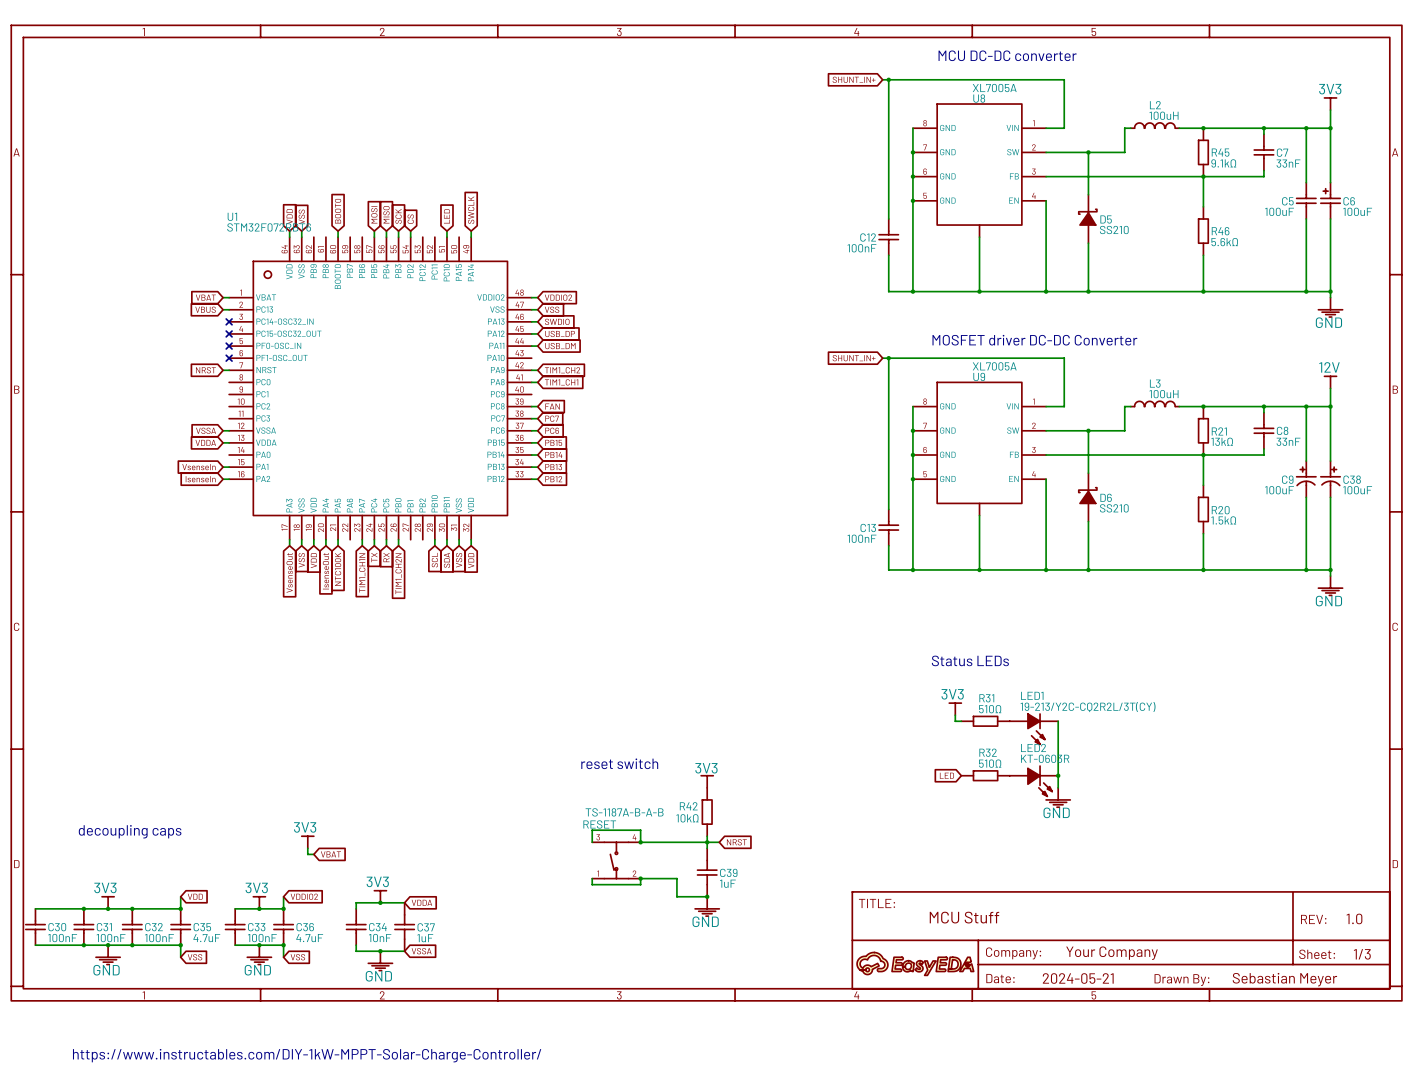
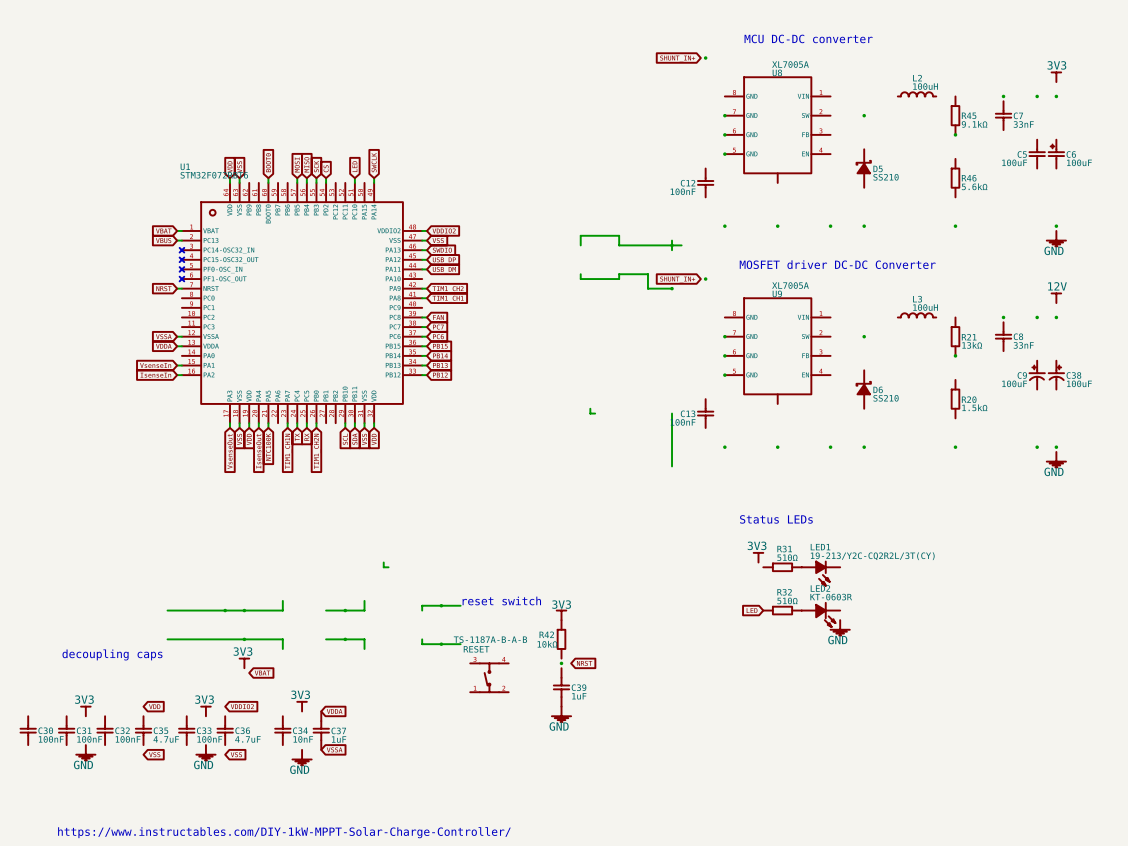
wire: (882, 79) (1064, 79) (1064, 128) (1046, 128) -> none
wire: (888, 79) (888, 218) -> none
wire: (1330, 110) (1330, 182) -> none
wire: (912, 128) (912, 291) -> none
wire: (1130, 128) (1124, 128) (1124, 152) (1046, 152) -> none
wire: (1179, 128) (1330, 128) -> none
junction: (1203, 128) -> none
wire: (1263, 128) (1263, 134) -> none
wire: (1306, 128) (1306, 182) -> none
wire: (1088, 152) (1088, 194) -> none
wire: (1263, 170) (1263, 176) (1046, 176) -> none
wire: (1203, 176) (1203, 206) -> none
wire: (1046, 200) (1046, 291) -> none
wire: (1306, 218) (1306, 291) -> none
wire: (1330, 218) (1330, 297) -> none
wire: (979, 237) (979, 291) -> none
wire: (1088, 243) (1088, 291) -> none
wire: (888, 255) (888, 291) (1330, 291) -> none
wire: (1203, 255) (1203, 291) -> none
junction: (1306, 291) -> none
wire: none -> (672, 240) (672, 250)
wire: none -> (580, 245) (580, 235) (619, 235) (619, 245) (681, 245)
wire: none -> (580, 274) (580, 279) (619, 279) (619, 274) (647, 274) (647, 288) (672, 288)
wire: (882, 358) (1064, 358) (1064, 406) (1046, 406) -> none
wire: (888, 358) (888, 509) -> none
junction: none -> (672, 288)
wire: (1330, 388) (1330, 461) -> none
wire: (912, 406) (912, 569) -> none
wire: (1130, 406) (1124, 406) (1124, 430) (1046, 430) -> none
wire: (1179, 406) (1330, 406) -> none
junction: (1203, 406) -> none
wire: (1263, 406) (1263, 412) -> none
wire: (1306, 406) (1306, 461) -> none
wire: (1088, 430) (1088, 473) -> none
wire: (1263, 448) (1263, 455) (1046, 455) -> none
wire: (1203, 455) (1203, 485) -> none
wire: (1046, 479) (1046, 569) -> none
wire: (1306, 497) (1306, 569) -> none
wire: (1330, 497) (1330, 576) -> none
part: (706, 513) -> none
wire: (979, 515) (979, 569) -> none
wire: none -> (590, 408) (590, 413) (595, 413)
wire: (1088, 521) (1088, 569) -> none
wire: none -> (672, 413) (672, 466)
wire: (1203, 533) (1203, 569) -> none
wire: (888, 545) (888, 569) (1330, 569) -> none
wire: none -> (383, 562) (383, 567) (388, 567)
wire: (955, 715) (955, 721) (961, 721) -> none
wire: (1058, 721) (1058, 787) -> none
wire: none -> (282, 600) (282, 610) (167, 610)
wire: none -> (364, 600) (364, 610) (326, 610)
junction: none -> (441, 605)
wire: none -> (460, 605) (422, 605) (422, 610)
junction: none -> (225, 610)
junction: none -> (244, 610)
junction: none -> (345, 610)
junction: (1058, 775) -> none
wire: none -> (167, 639) (282, 639) (282, 648)
junction: none -> (244, 639)
wire: none -> (326, 639) (364, 639) (364, 648)
junction: none -> (345, 639)
wire: none -> (422, 639) (422, 644) (460, 644)
junction: none -> (441, 644)
wire: (707, 836) (707, 848) -> none
wire: (592, 842) (592, 830) (640, 830) (640, 842) (719, 842) -> none
junction: (640, 842) -> none
wire: (307, 848) (307, 854) (313, 854) -> none
wire: (592, 878) (592, 884) (640, 884) (640, 878) (676, 878) (676, 896) (707, 896) -> none
junction: (640, 878) -> none
wire: (180, 896) (180, 908) (35, 908) -> none
wire: (283, 896) (283, 908) (235, 908) -> none
junction: (707, 896) -> none
junction: (380, 902) -> none
wire: (404, 902) (356, 902) (356, 908) -> none
junction: (83, 908) -> none
junction: (108, 908) -> none
junction: (132, 908) -> none
junction: (180, 908) -> none
junction: (259, 908) -> none
junction: (283, 908) -> none
wire: (35, 945) (180, 945) (180, 957) -> none
junction: (83, 945) -> none
junction: (108, 945) -> none
junction: (132, 945) -> none
junction: (180, 945) -> none
wire: (235, 945) (283, 945) (283, 957) -> none
junction: (259, 945) -> none
junction: (283, 945) -> none
wire: (356, 945) (356, 951) (404, 951) -> none
junction: (380, 951) -> none

